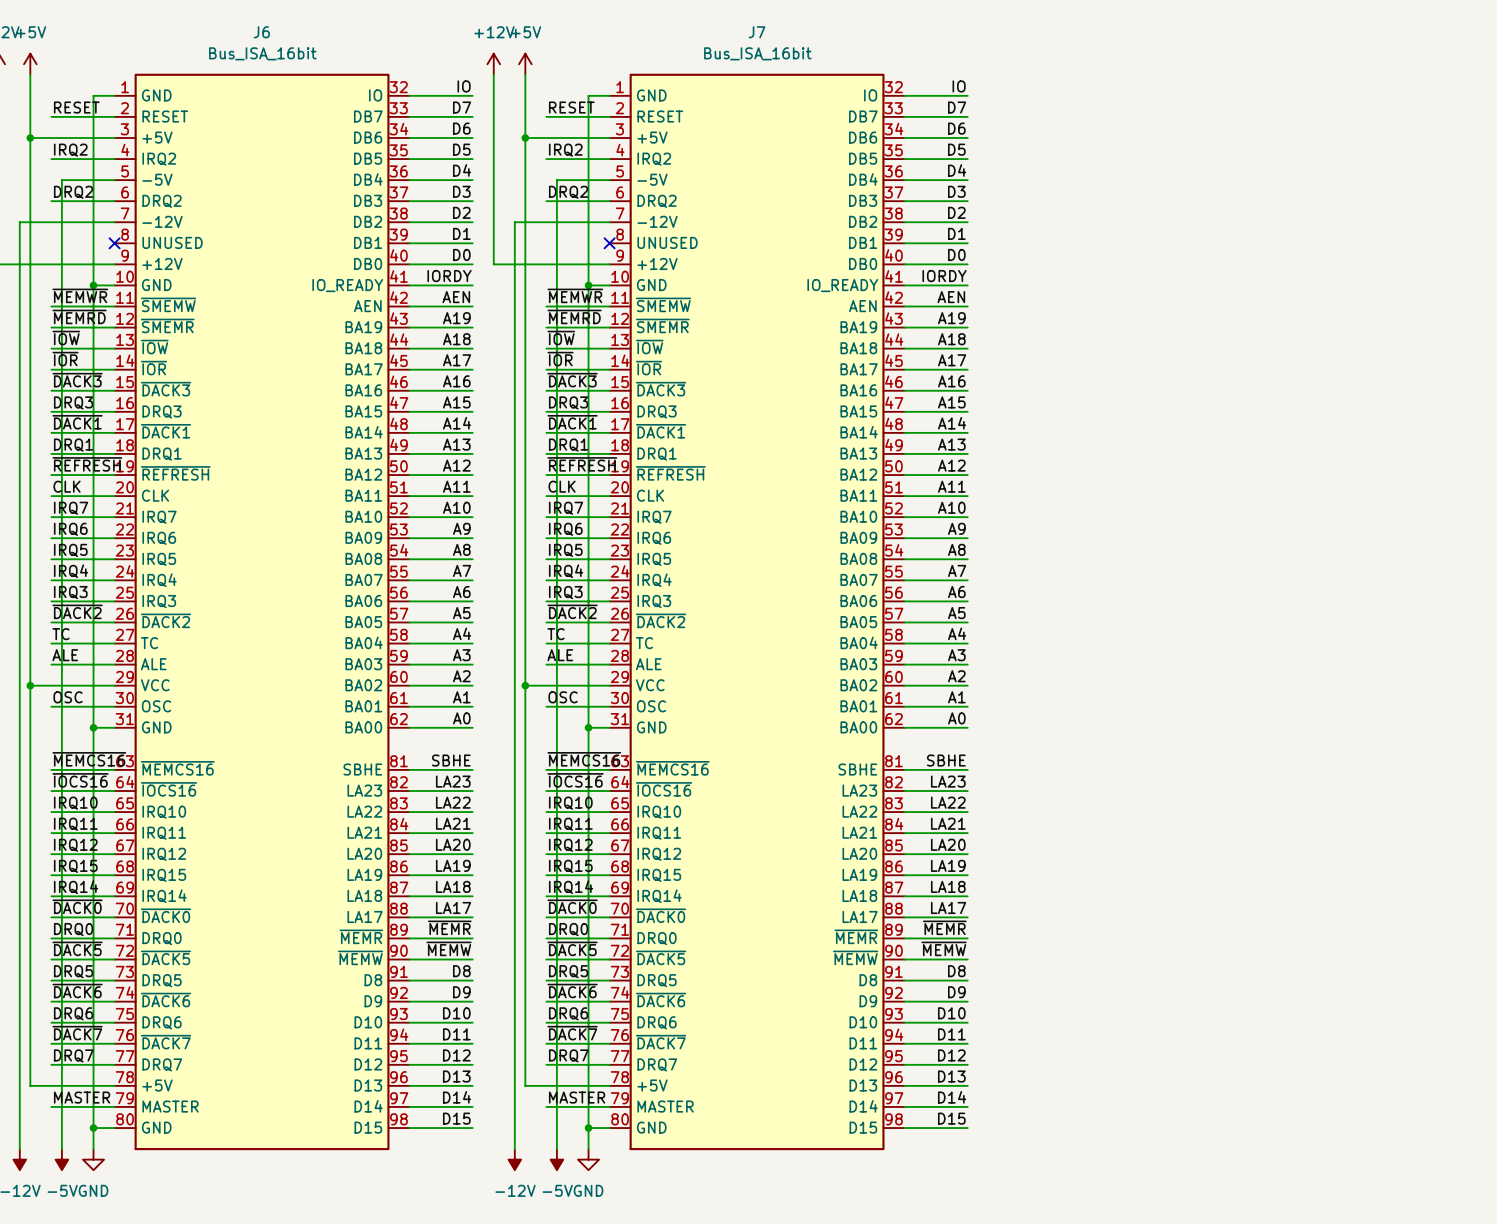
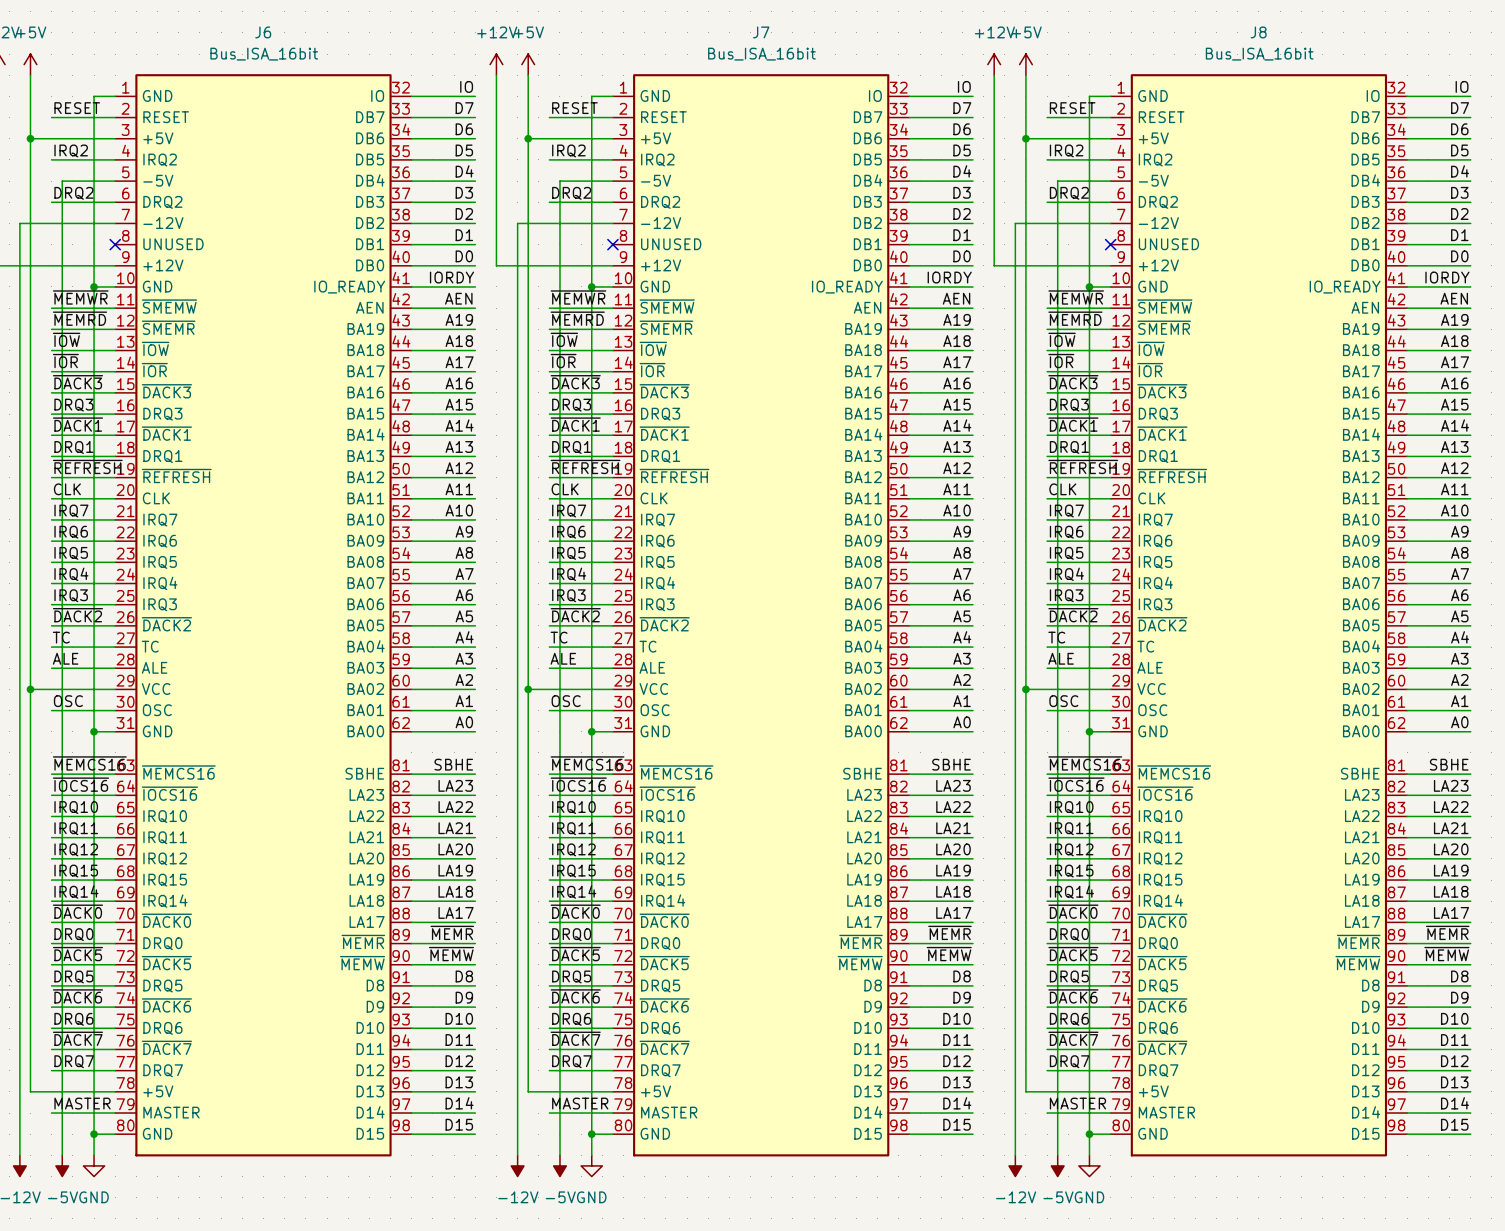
power symbol: none -> +12V (994, 64)
power symbol: none -> +5V (1025, 64)
wire: none -> (994, 75) (994, 265) (1110, 265)
wire: none -> (1025, 75) (1025, 1091) (1110, 1091)
label: none -> IO (1462, 86)
wire: none -> (1110, 96) (1089, 96) (1089, 1155)
wire: none -> (1407, 96) (1470, 96)
label: none -> RESET (1072, 108)
label: none -> D7 (1460, 108)
wire: none -> (1047, 117) (1110, 117)
wire: none -> (1407, 117) (1470, 117)
label: none -> D6 (1459, 129)
wire: none -> (1025, 138) (1110, 138)
junction: none -> (1025, 138)
wire: none -> (1407, 138) (1470, 138)
label: none -> D5 (1459, 150)
label: none -> IRQ2 (1066, 150)
wire: none -> (1047, 159) (1110, 159)
wire: none -> (1407, 159) (1470, 159)
label: none -> D4 (1460, 171)
wire: none -> (1110, 181) (1057, 181) (1057, 1155)
wire: none -> (1407, 181) (1470, 181)
label: none -> D3 (1459, 192)
label: none -> DRQ2 (1069, 193)
wire: none -> (1047, 202) (1110, 202)
wire: none -> (1407, 202) (1470, 202)
label: none -> D2 (1459, 214)
wire: none -> (1110, 223) (1015, 223) (1015, 1155)
wire: none -> (1407, 223) (1470, 223)
label: none -> D1 (1459, 235)
no-connect mark: none -> (1110, 244)
wire: none -> (1407, 244) (1470, 244)
label: none -> D0 (1459, 256)
wire: none -> (1407, 265) (1470, 265)
label: none -> IORDY (1447, 277)
wire: none -> (1089, 286) (1110, 286)
junction: none -> (1089, 286)
wire: none -> (1407, 286) (1470, 286)
label: none -> ~{MEMWR} (1076, 297)
label: none -> AEN (1454, 298)
wire: none -> (1047, 308) (1110, 308)
wire: none -> (1407, 308) (1470, 308)
label: none -> ~{MEMRD} (1075, 318)
label: none -> A19 (1454, 319)
wire: none -> (1047, 329) (1110, 329)
wire: none -> (1407, 329) (1470, 329)
label: none -> ~{IOW} (1062, 339)
label: none -> A18 (1454, 341)
wire: none -> (1047, 350) (1110, 350)
wire: none -> (1407, 350) (1470, 350)
label: none -> ~{IOR} (1061, 361)
label: none -> A17 (1455, 362)
wire: none -> (1047, 371) (1110, 371)
wire: none -> (1407, 371) (1470, 371)
label: none -> ~{DACK3} (1073, 382)
label: none -> A16 (1454, 383)
wire: none -> (1047, 392) (1110, 392)
wire: none -> (1407, 392) (1470, 392)
label: none -> DRQ3 (1069, 405)
label: none -> A15 (1454, 404)
wire: none -> (1047, 414) (1110, 414)
wire: none -> (1407, 414) (1470, 414)
label: none -> ~{DACK1} (1073, 424)
label: none -> A14 (1455, 425)
wire: none -> (1047, 435) (1110, 435)
wire: none -> (1407, 435) (1470, 435)
label: none -> A13 (1454, 446)
label: none -> DRQ1 (1069, 447)
wire: none -> (1047, 456) (1110, 456)
wire: none -> (1407, 456) (1470, 456)
label: none -> ~{REFRESH} (1083, 466)
label: none -> A12 (1454, 468)
wire: none -> (1047, 477) (1110, 477)
wire: none -> (1407, 477) (1470, 477)
label: none -> CLK (1062, 489)
label: none -> A11 (1454, 489)
wire: none -> (1047, 498) (1110, 498)
wire: none -> (1407, 498) (1470, 498)
label: none -> A10 (1454, 510)
label: none -> IRQ7 (1066, 511)
wire: none -> (1047, 519) (1110, 519)
wire: none -> (1407, 519) (1470, 519)
label: none -> A9 (1459, 531)
label: none -> IRQ6 (1066, 532)
wire: none -> (1047, 541) (1110, 541)
wire: none -> (1407, 541) (1470, 541)
label: none -> A8 (1459, 552)
label: none -> IRQ5 (1066, 553)
wire: none -> (1047, 562) (1110, 562)
wire: none -> (1407, 562) (1470, 562)
label: none -> A7 (1460, 574)
label: none -> IRQ4 (1066, 574)
wire: none -> (1047, 583) (1110, 583)
wire: none -> (1407, 583) (1470, 583)
label: none -> IRQ3 (1066, 595)
label: none -> A6 (1459, 595)
wire: none -> (1047, 604) (1110, 604)
wire: none -> (1407, 604) (1470, 604)
label: none -> ~{DACK2} (1073, 615)
J8: none -> Bus_ISA_16bit (1258, 615)
label: none -> A5 (1459, 616)
wire: none -> (1047, 625) (1110, 625)
wire: none -> (1407, 625) (1470, 625)
label: none -> A4 (1460, 637)
label: none -> TC (1056, 637)
wire: none -> (1047, 647) (1110, 647)
wire: none -> (1407, 647) (1470, 647)
label: none -> ALE (1061, 658)
label: none -> A3 (1459, 658)
wire: none -> (1047, 668) (1110, 668)
wire: none -> (1407, 668) (1470, 668)
label: none -> A2 (1459, 679)
wire: none -> (1025, 689) (1110, 689)
junction: none -> (1025, 689)
wire: none -> (1407, 689) (1470, 689)
label: none -> OSC (1063, 701)
label: none -> A1 (1459, 701)
wire: none -> (1047, 710) (1110, 710)
wire: none -> (1407, 710) (1470, 710)
label: none -> A0 (1459, 722)
wire: none -> (1089, 731) (1110, 731)
junction: none -> (1089, 731)
wire: none -> (1407, 731) (1470, 731)
label: none -> ~{MEMCS16} (1085, 763)
label: none -> SBHE (1449, 764)
wire: none -> (1047, 774) (1110, 774)
wire: none -> (1407, 774) (1470, 774)
label: none -> ~{IOCS16} (1076, 784)
label: none -> LA23 (1451, 785)
wire: none -> (1047, 795) (1110, 795)
wire: none -> (1407, 795) (1470, 795)
label: none -> LA22 (1451, 807)
label: none -> IRQ10 (1071, 807)
wire: none -> (1047, 816) (1110, 816)
wire: none -> (1407, 816) (1470, 816)
label: none -> LA21 (1451, 828)
label: none -> IRQ11 (1071, 828)
wire: none -> (1047, 837) (1110, 837)
wire: none -> (1407, 837) (1470, 837)
label: none -> LA20 (1451, 849)
label: none -> IRQ12 (1071, 849)
wire: none -> (1047, 858) (1110, 858)
wire: none -> (1407, 858) (1470, 858)
label: none -> LA19 (1451, 870)
label: none -> IRQ15 (1071, 871)
wire: none -> (1047, 880) (1110, 880)
wire: none -> (1407, 880) (1470, 880)
label: none -> LA18 (1451, 891)
label: none -> IRQ14 (1071, 892)
wire: none -> (1047, 901) (1110, 901)
wire: none -> (1407, 901) (1470, 901)
label: none -> ~{DACK0} (1073, 911)
label: none -> LA17 (1451, 912)
wire: none -> (1047, 922) (1110, 922)
wire: none -> (1407, 922) (1470, 922)
label: none -> ~{MEMR} (1447, 932)
label: none -> DRQ0 (1069, 934)
wire: none -> (1047, 943) (1110, 943)
wire: none -> (1407, 943) (1470, 943)
label: none -> ~{DACK5} (1073, 954)
label: none -> ~{MEMW} (1446, 954)
wire: none -> (1047, 964) (1110, 964)
wire: none -> (1407, 964) (1470, 964)
label: none -> DRQ5 (1069, 976)
label: none -> D8 (1459, 976)
wire: none -> (1047, 985) (1110, 985)
wire: none -> (1407, 985) (1470, 985)
label: none -> ~{DACK6} (1073, 996)
label: none -> D9 (1459, 997)
wire: none -> (1047, 1007) (1110, 1007)
wire: none -> (1407, 1007) (1470, 1007)
label: none -> DRQ6 (1069, 1019)
label: none -> D10 (1454, 1018)
wire: none -> (1047, 1028) (1110, 1028)
wire: none -> (1407, 1028) (1470, 1028)
label: none -> ~{DACK7} (1073, 1038)
label: none -> D11 (1454, 1040)
wire: none -> (1047, 1049) (1110, 1049)
wire: none -> (1407, 1049) (1470, 1049)
label: none -> DRQ7 (1069, 1061)
label: none -> D12 (1454, 1061)
wire: none -> (1047, 1070) (1110, 1070)
wire: none -> (1407, 1070) (1470, 1070)
label: none -> D13 (1454, 1082)
wire: none -> (1407, 1091) (1470, 1091)
label: none -> MASTER (1077, 1103)
label: none -> D14 (1455, 1103)
wire: none -> (1047, 1113) (1110, 1113)
wire: none -> (1407, 1113) (1470, 1113)
label: none -> D15 (1454, 1124)
wire: none -> (1089, 1134) (1110, 1134)
junction: none -> (1089, 1134)
wire: none -> (1407, 1134) (1470, 1134)
power symbol: none -> -12V (1015, 1165)
power symbol: none -> -5V (1057, 1165)
power symbol: none -> GND (1089, 1165)

